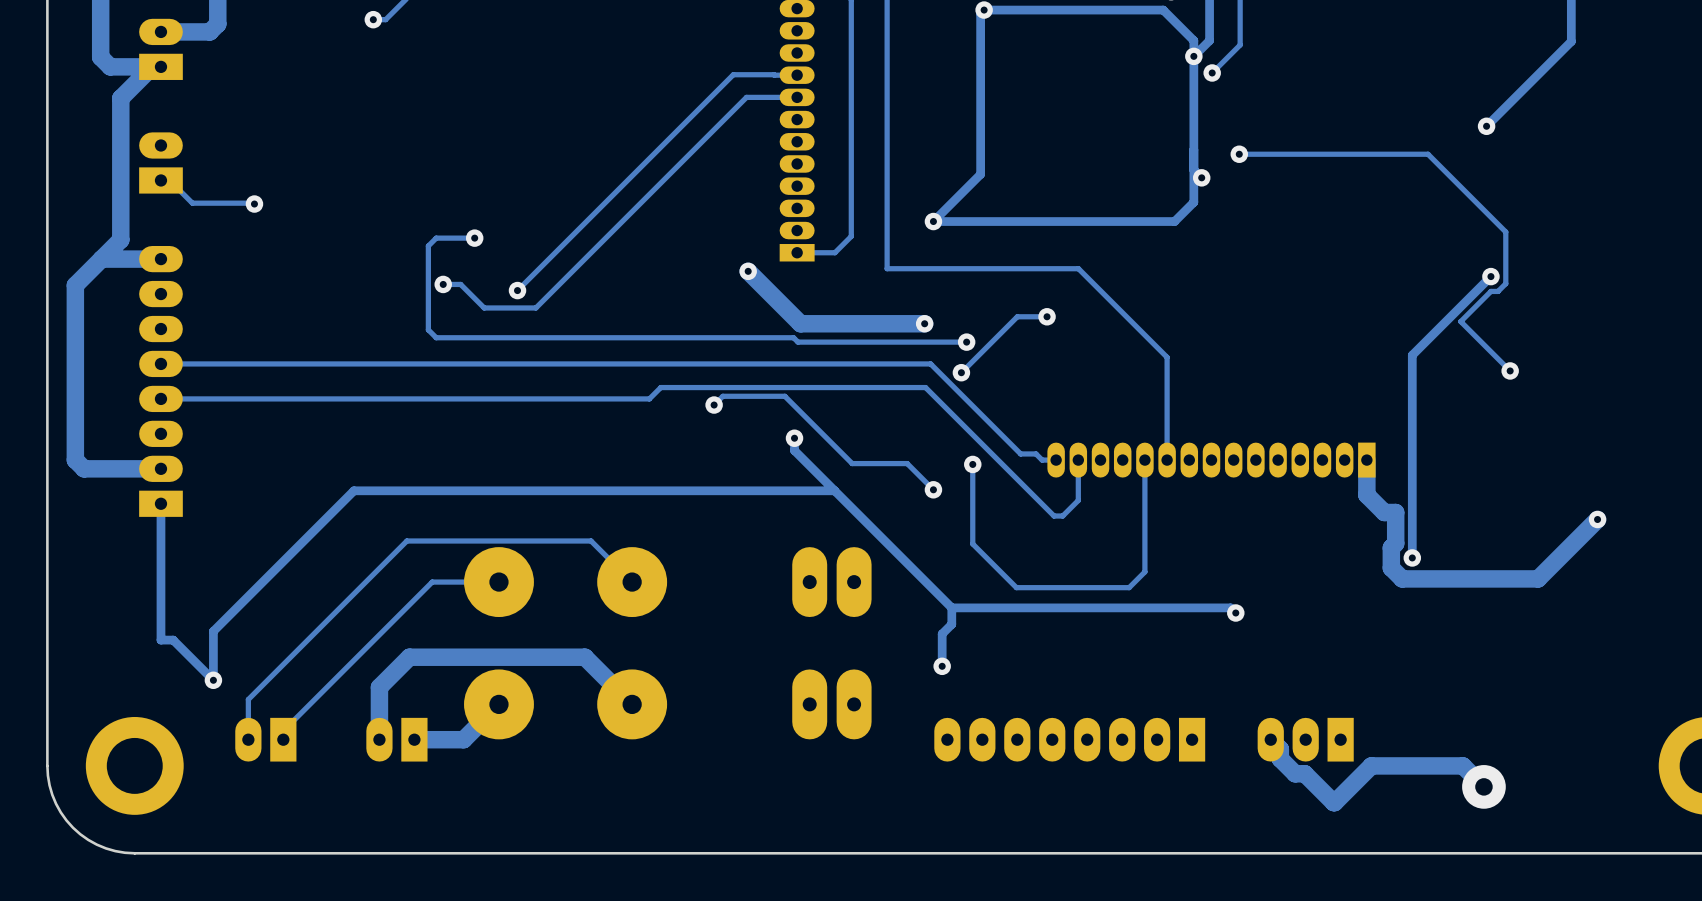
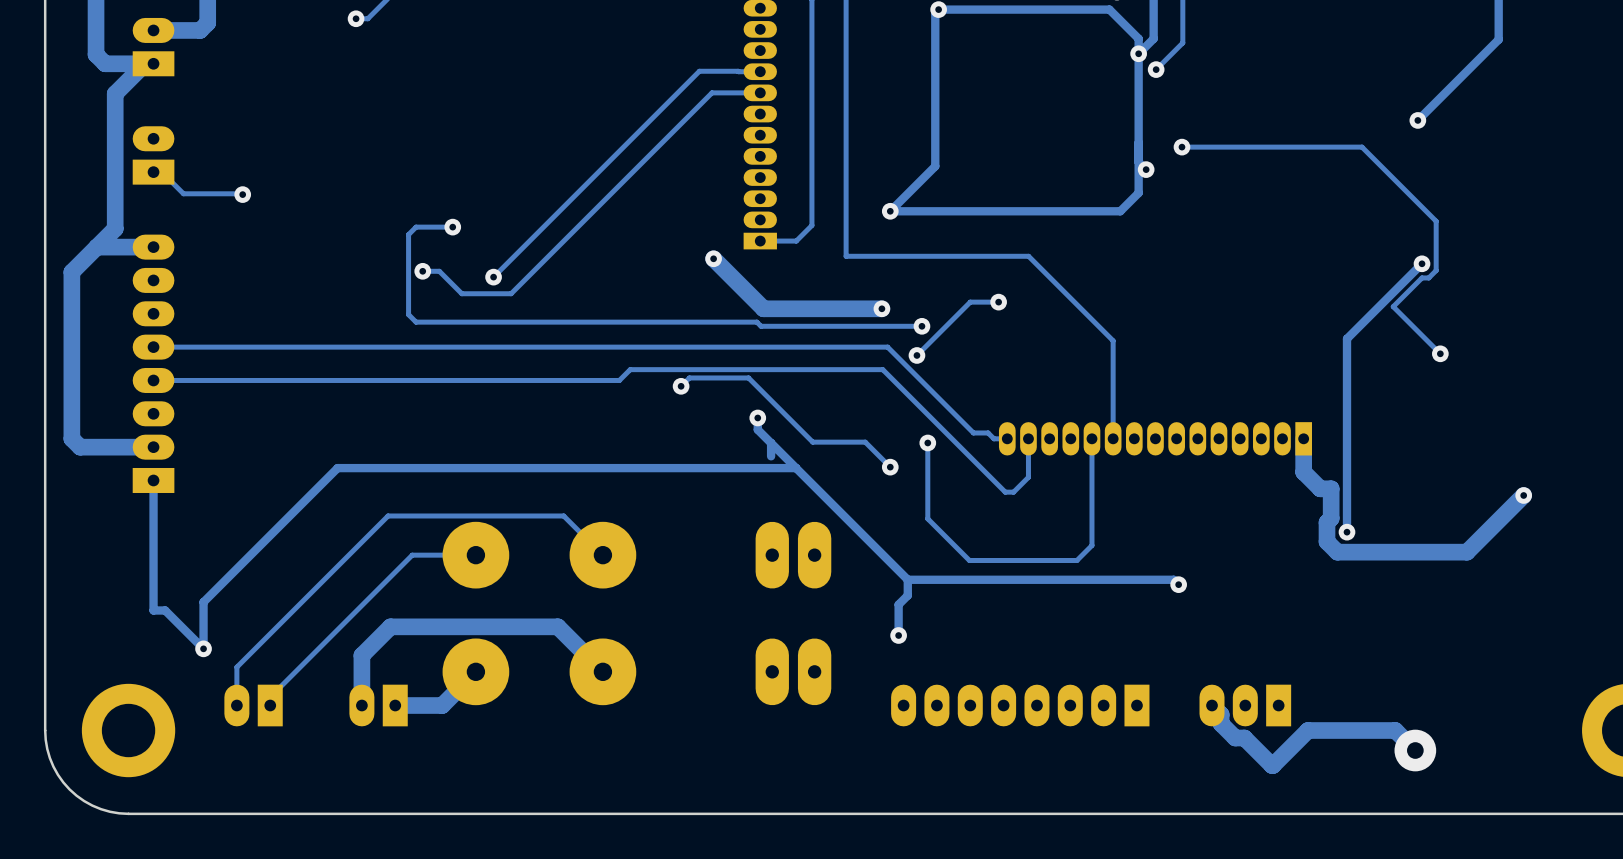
track: none -> (771, 443) (771, 456)

